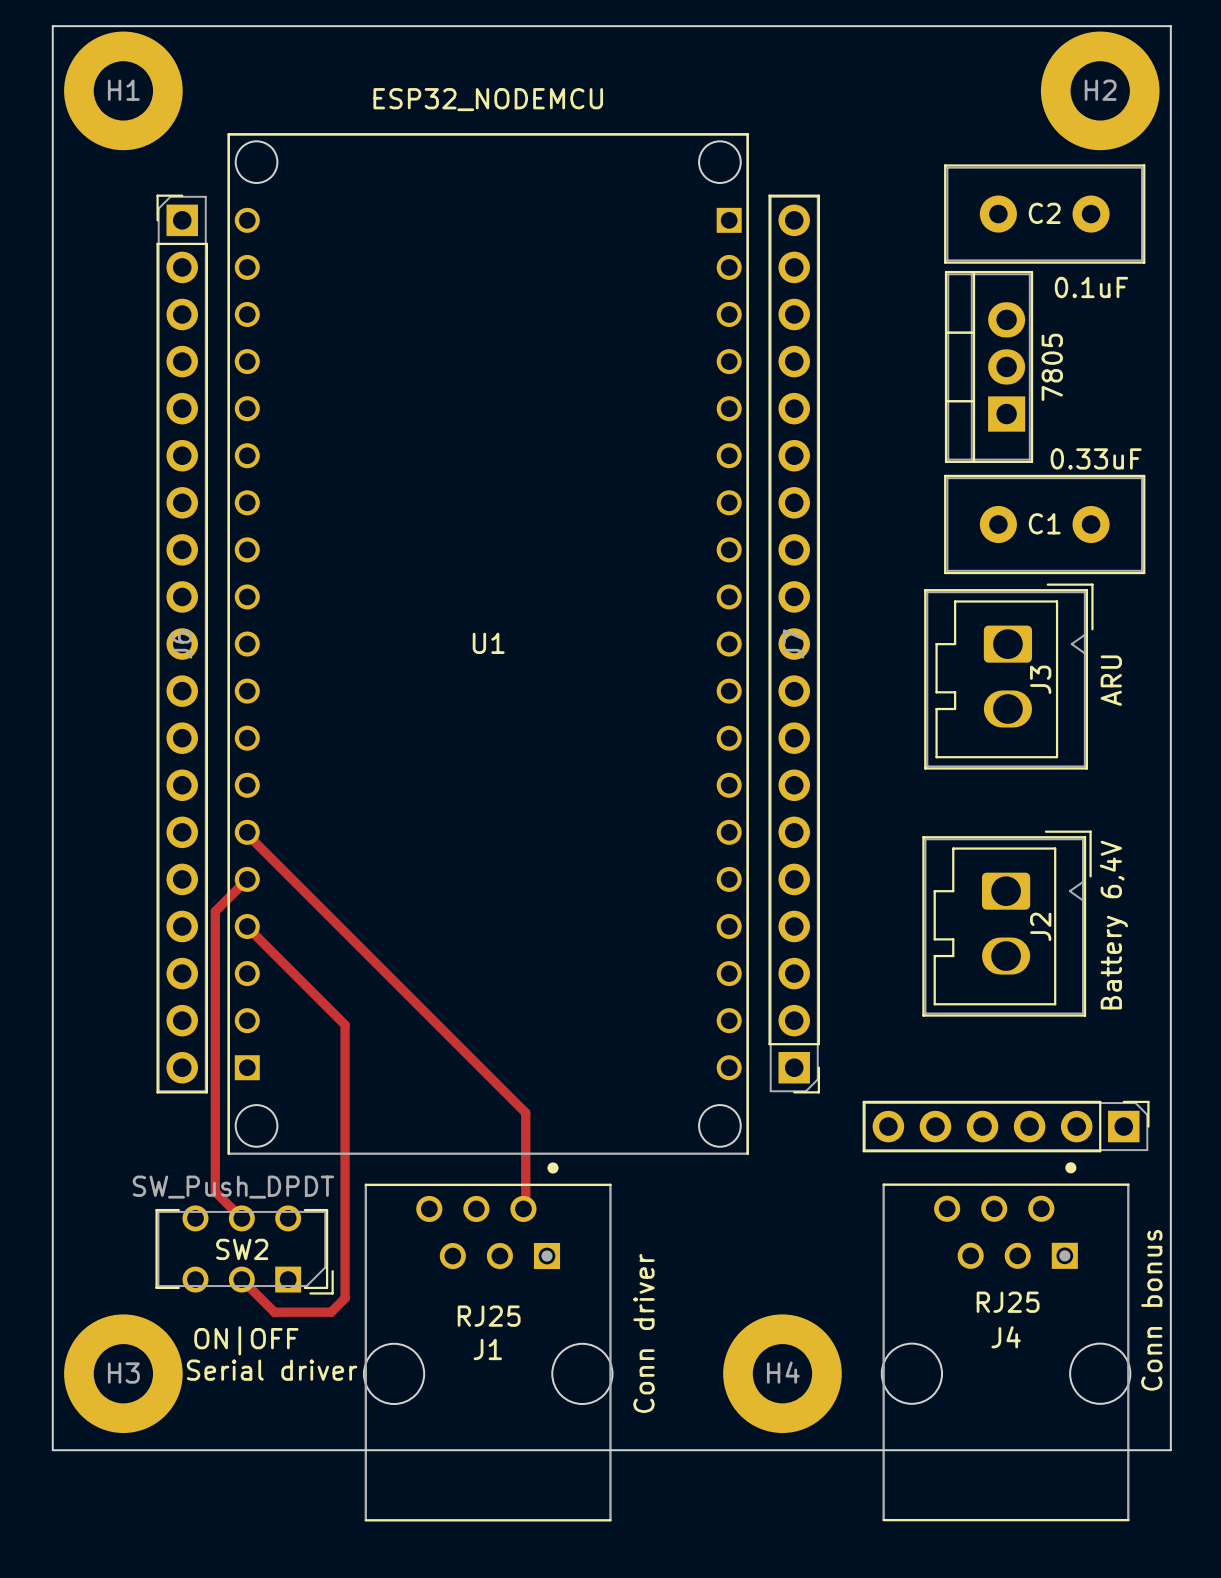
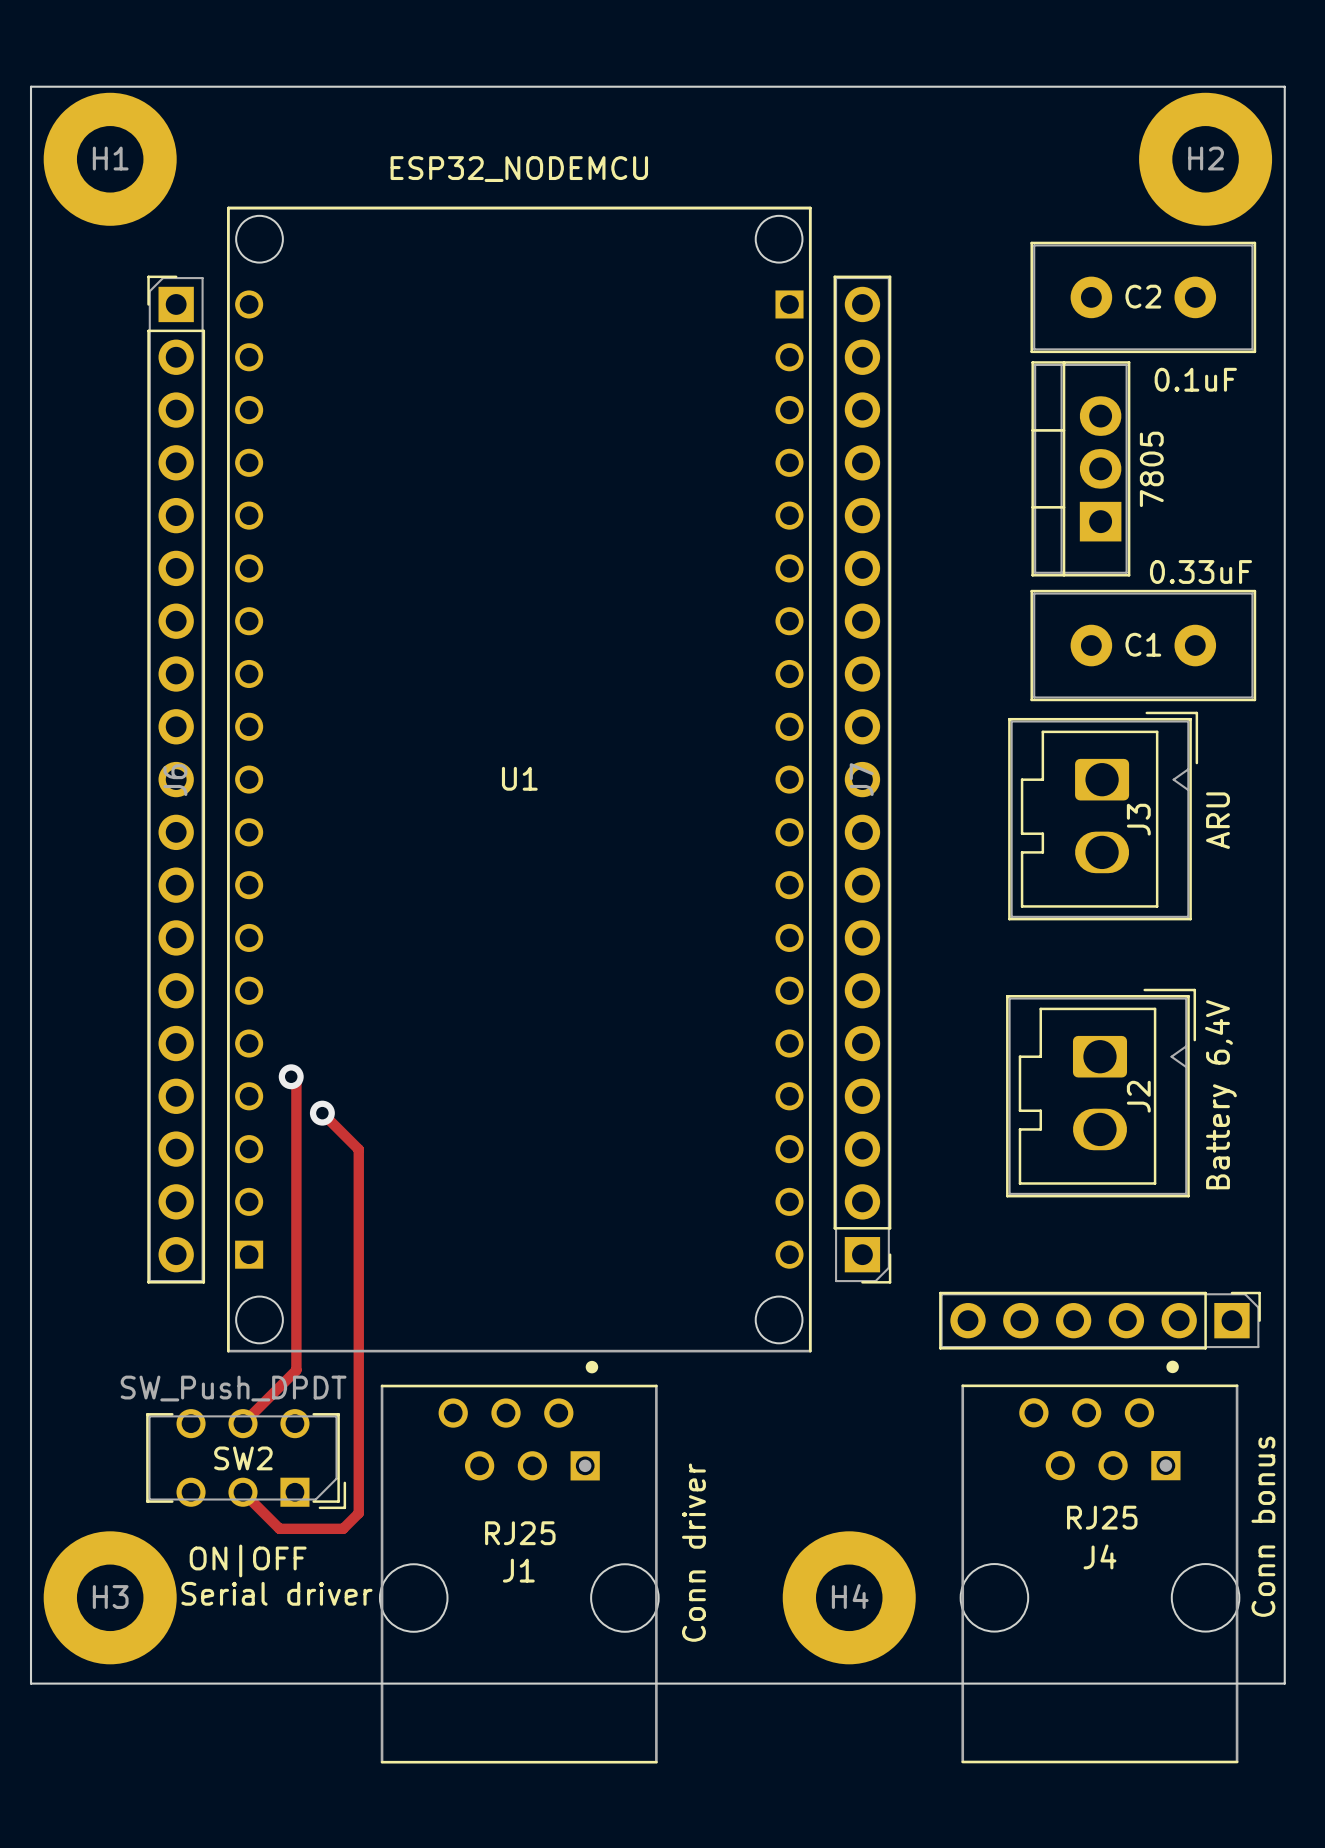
track: (247, 832) (247, 834) (525, 1112) (525, 1206) (523, 1208) -> none
track: (247, 879) (215, 911) (215, 1191) (241, 1218) -> (291, 1076) (296, 1081) (296, 1370) (243, 1423)
via: none -> (291, 1076)
track: (247, 926) (345, 1024) -> (322, 1113) (358, 1149) (358, 1206)
via: none -> (322, 1113)

